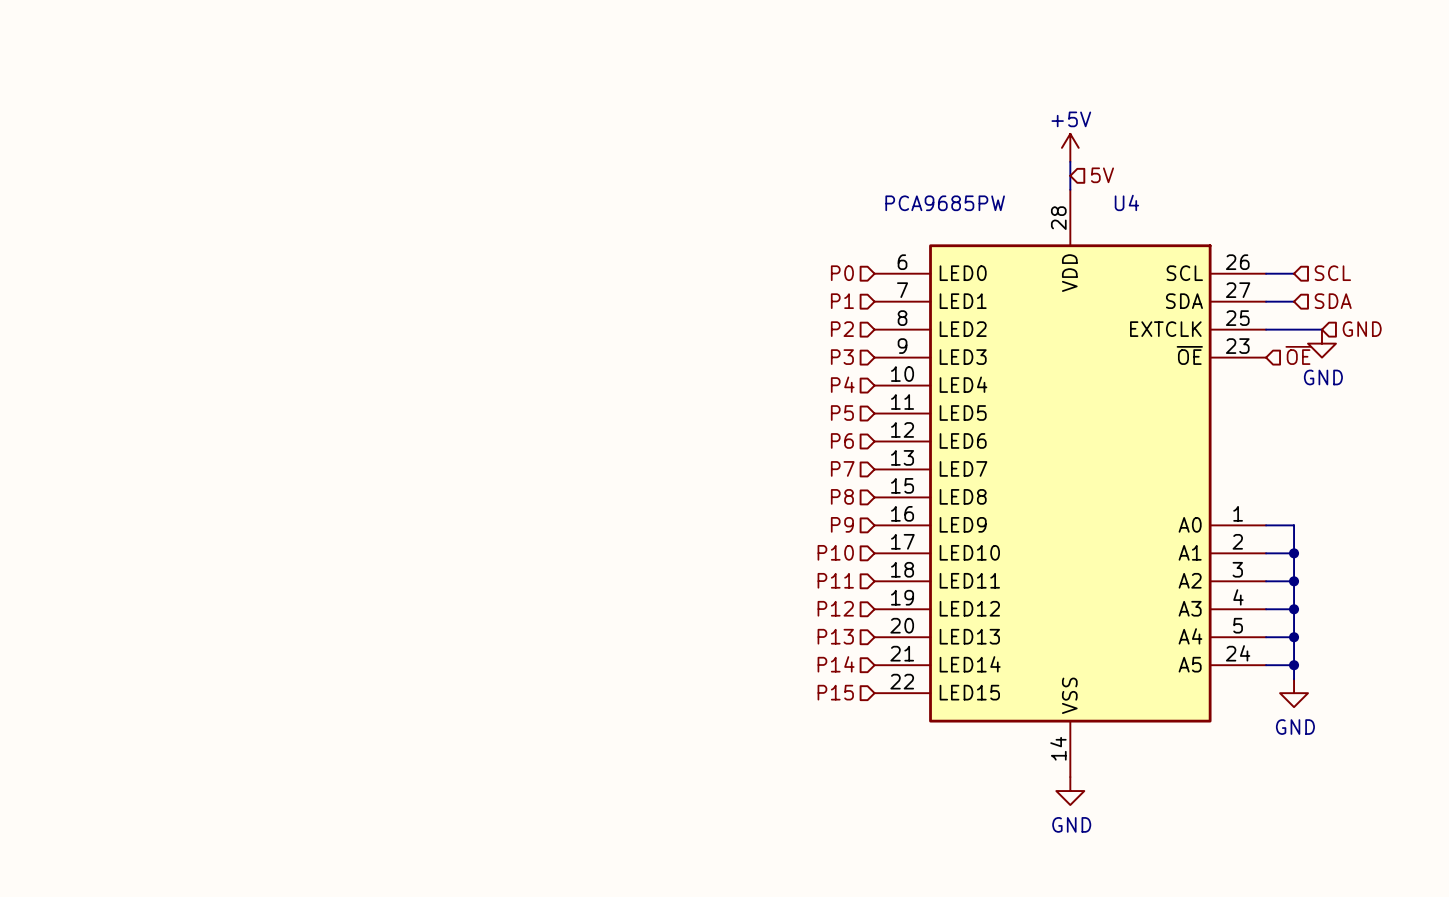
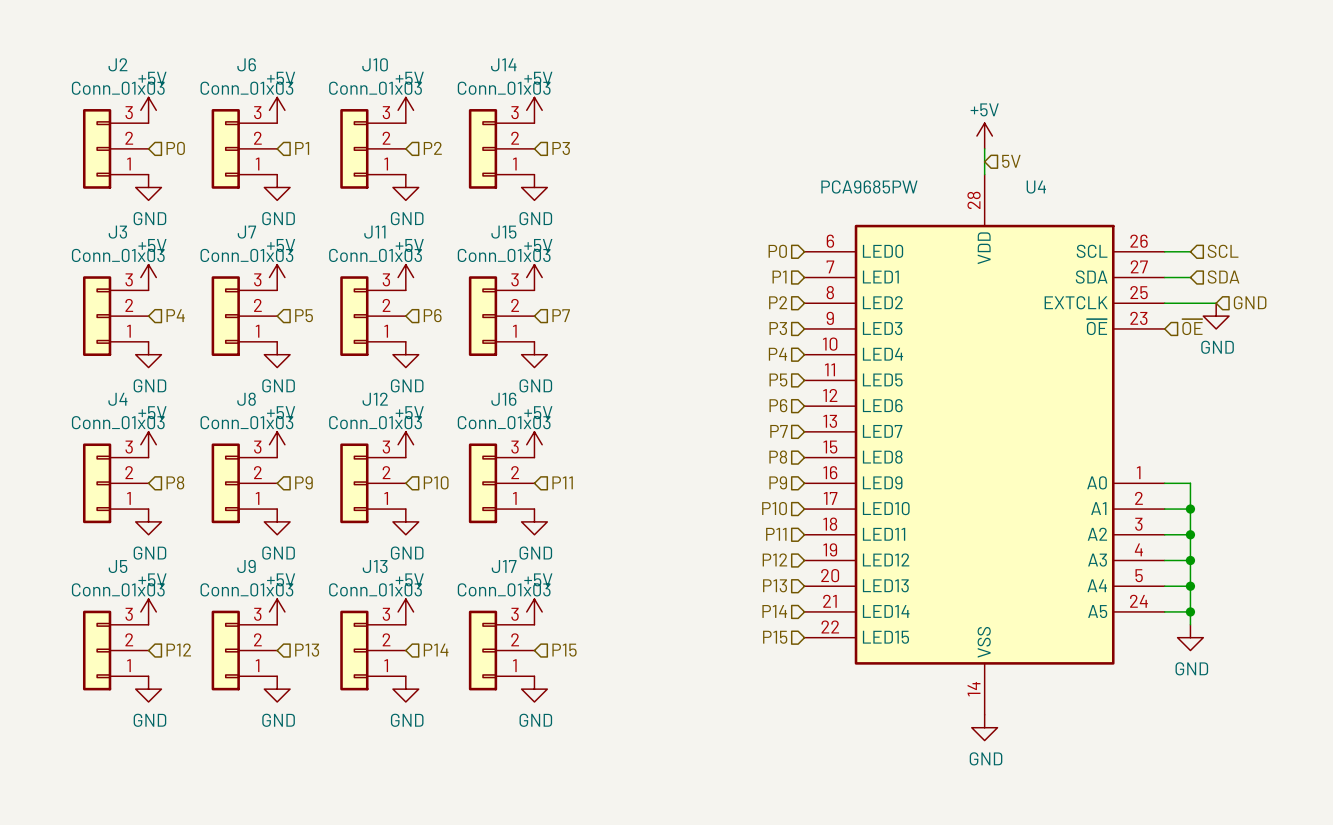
power symbol: none -> +5V (148, 110)
power symbol: none -> +5V (277, 110)
power symbol: none -> +5V (405, 110)
power symbol: none -> +5V (534, 110)
J2: none -> Conn_01x03 (115, 148)
hierarchical label: none -> P0 (175, 148)
J6: none -> Conn_01x03 (244, 148)
hierarchical label: none -> P1 (302, 148)
J10: none -> Conn_01x03 (373, 148)
hierarchical label: none -> P2 (432, 148)
J14: none -> Conn_01x03 (501, 148)
hierarchical label: none -> P3 (561, 148)
power symbol: none -> GND (148, 187)
power symbol: none -> GND (277, 187)
power symbol: none -> GND (405, 187)
power symbol: none -> GND (534, 187)
power symbol: none -> +5V (148, 277)
power symbol: none -> +5V (277, 277)
power symbol: none -> +5V (405, 277)
power symbol: none -> +5V (534, 277)
hierarchical label: none -> P4 (175, 315)
J3: none -> Conn_01x03 (115, 316)
J7: none -> Conn_01x03 (244, 316)
hierarchical label: none -> P5 (304, 315)
J11: none -> Conn_01x03 (373, 316)
hierarchical label: none -> P6 (432, 315)
J15: none -> Conn_01x03 (501, 316)
hierarchical label: none -> P7 (561, 315)
power symbol: none -> GND (148, 354)
power symbol: none -> GND (277, 354)
power symbol: none -> GND (405, 354)
power symbol: none -> GND (534, 354)
power symbol: none -> +5V (148, 444)
power symbol: none -> +5V (277, 444)
power symbol: none -> +5V (405, 444)
power symbol: none -> +5V (534, 444)
hierarchical label: none -> P8 (175, 482)
hierarchical label: none -> P9 (303, 482)
hierarchical label: none -> P10 (436, 482)
hierarchical label: none -> P11 (562, 482)
J4: none -> Conn_01x03 (115, 483)
J8: none -> Conn_01x03 (244, 483)
J12: none -> Conn_01x03 (373, 483)
J16: none -> Conn_01x03 (501, 483)
power symbol: none -> GND (148, 521)
power symbol: none -> GND (277, 521)
power symbol: none -> GND (405, 521)
power symbol: none -> GND (534, 521)
power symbol: none -> +5V (148, 611)
power symbol: none -> +5V (277, 611)
power symbol: none -> +5V (405, 611)
power symbol: none -> +5V (534, 611)
hierarchical label: none -> P12 (178, 649)
hierarchical label: none -> P13 (307, 650)
hierarchical label: none -> P14 (436, 650)
hierarchical label: none -> P15 (564, 650)
J5: none -> Conn_01x03 (115, 650)
J9: none -> Conn_01x03 (244, 650)
J13: none -> Conn_01x03 (373, 650)
J17: none -> Conn_01x03 (501, 650)
power symbol: none -> GND (148, 689)
power symbol: none -> GND (277, 689)
power symbol: none -> GND (405, 689)
power symbol: none -> GND (534, 689)

